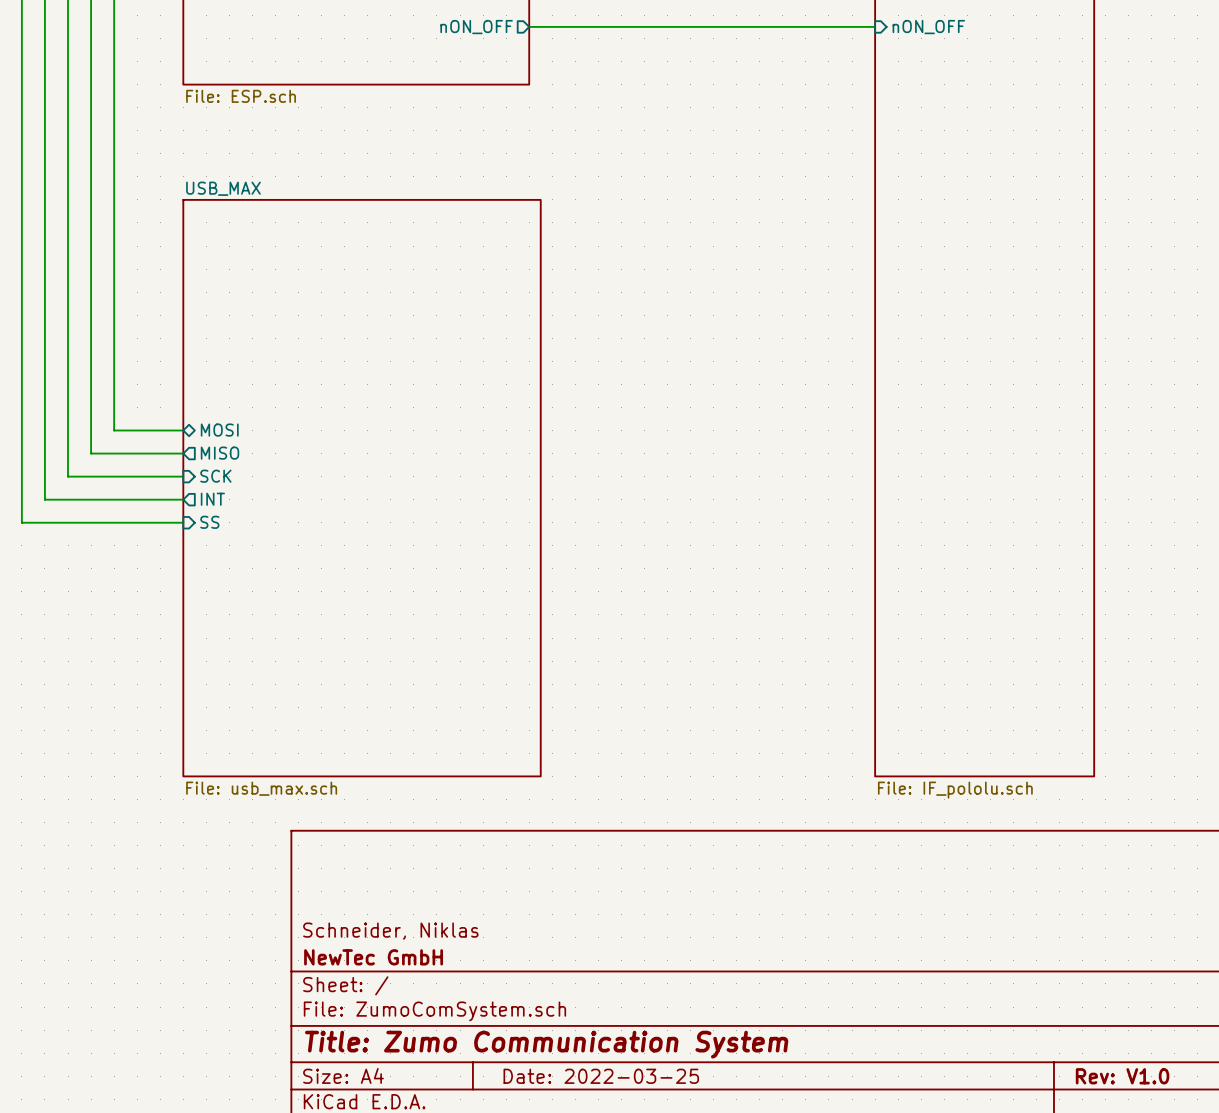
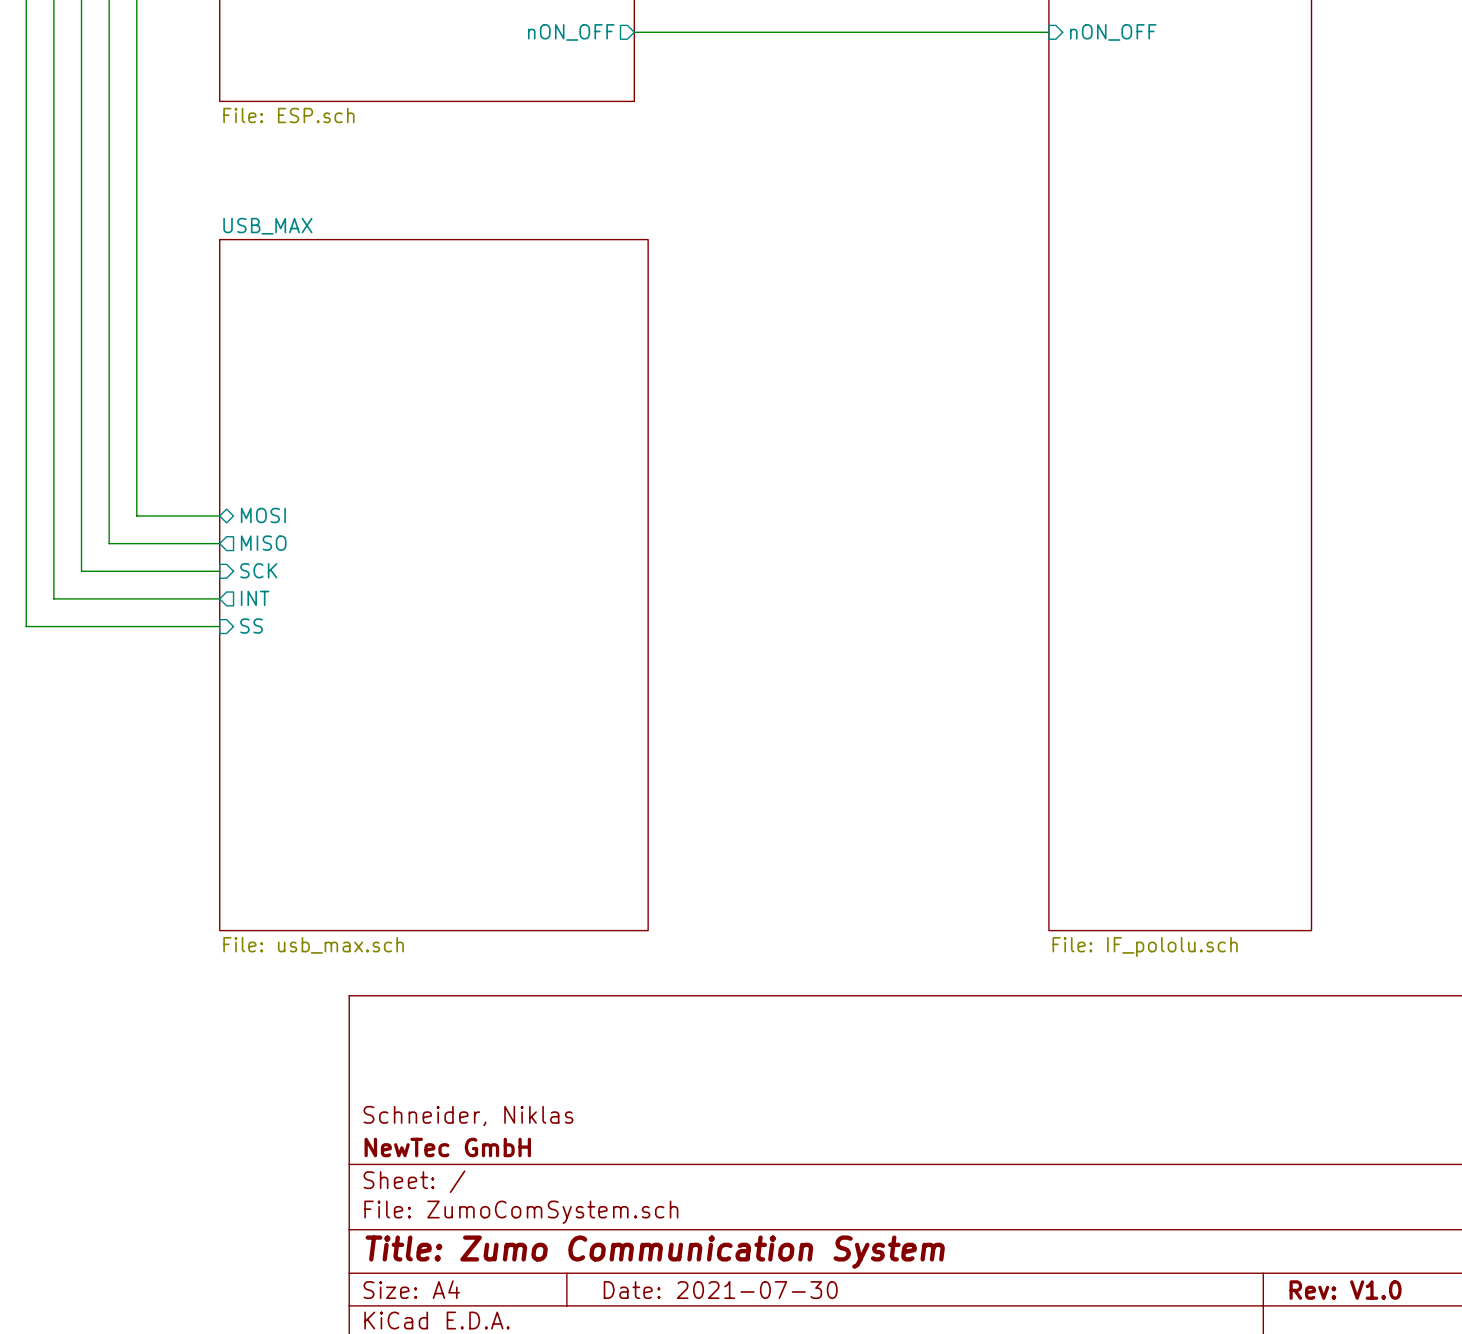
title block: Date: 2022-03-25 (601, 1076) -> Date: 2021-07-30 (720, 1290)

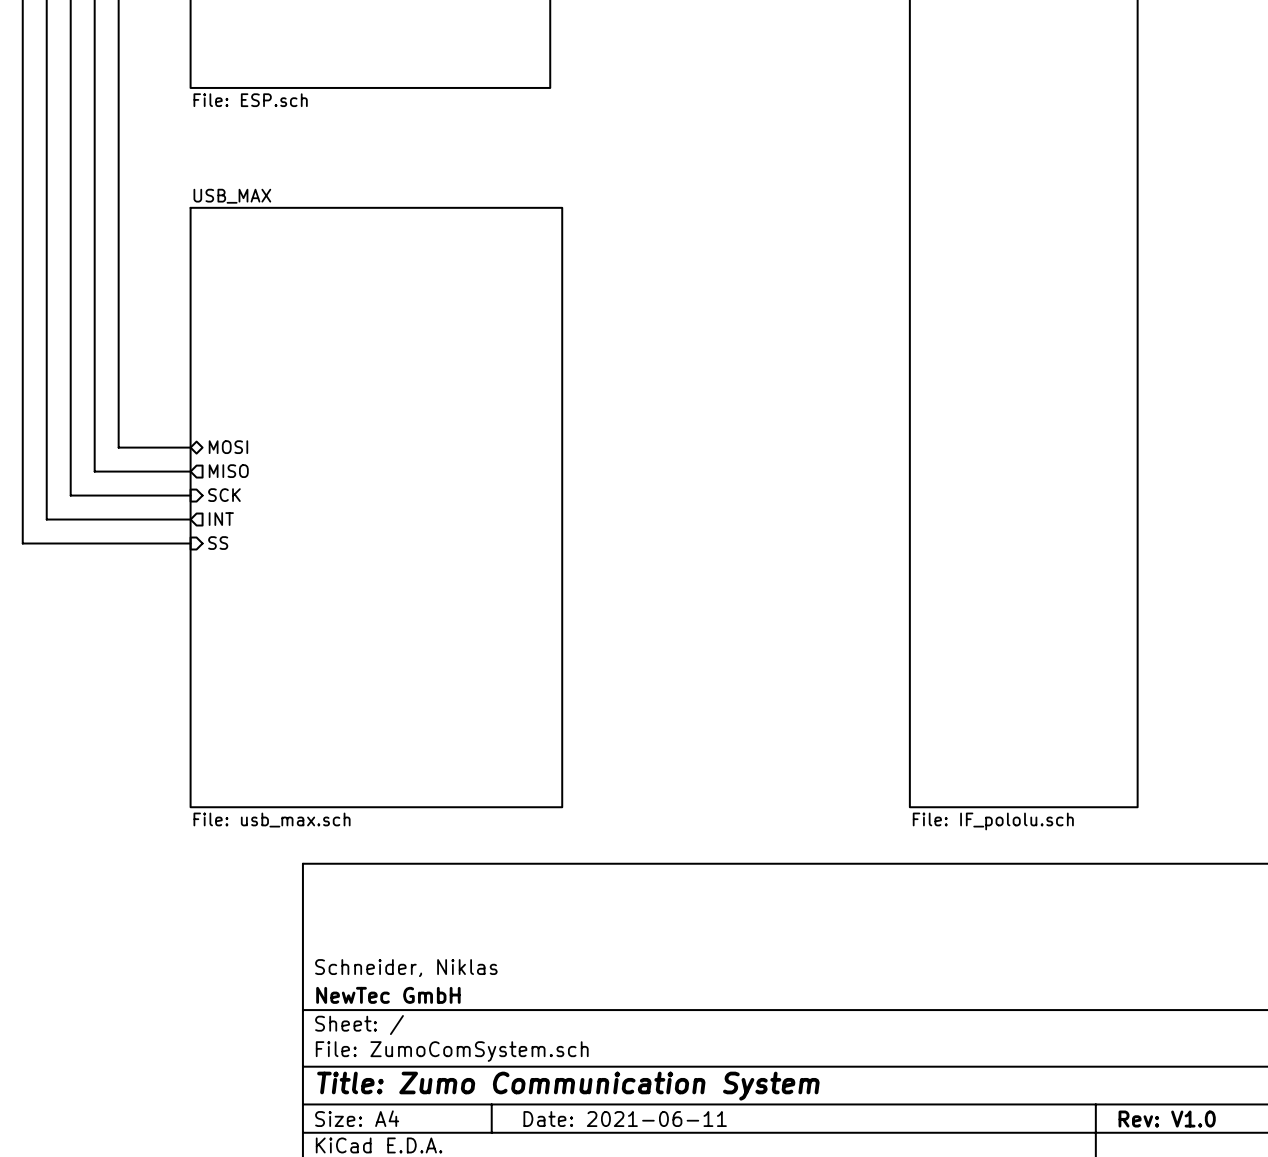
sheet pin: nON_OFF (571, 32) -> none
wire: (634, 32) (1048, 32) -> none
sheet pin: nON_OFF (1113, 32) -> none
title block: Date: 2021-07-30 (720, 1290) -> Date: 2021-06-11 (625, 1119)

